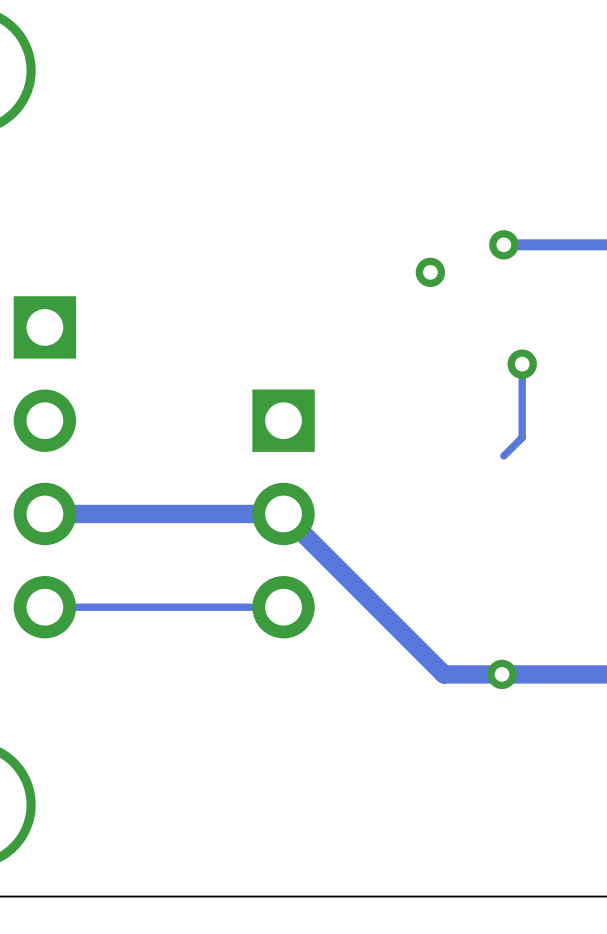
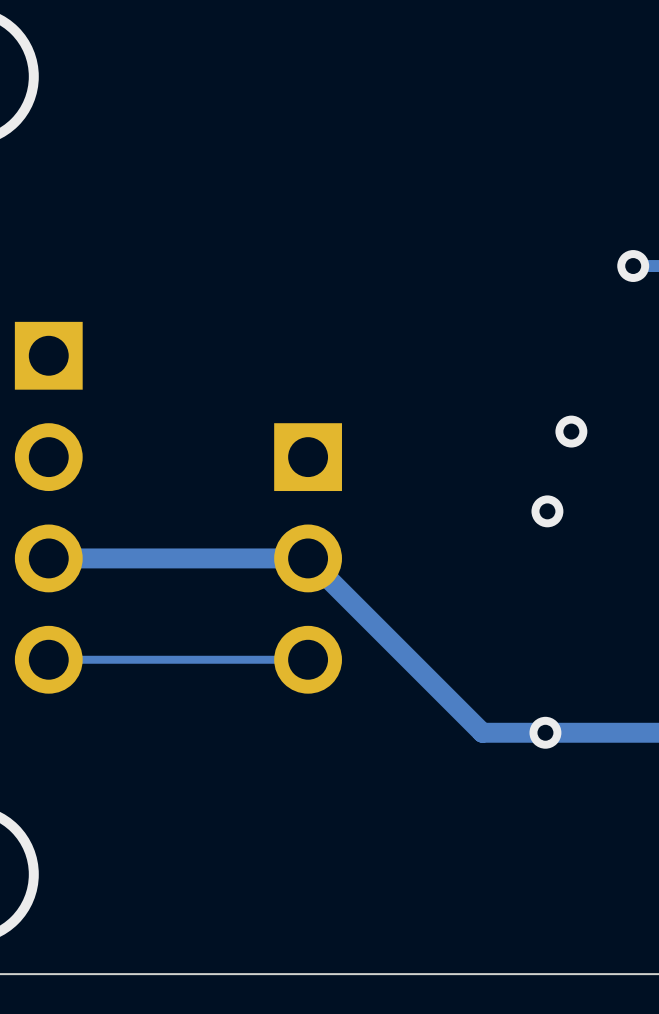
via: (503, 244) -> none
track: (582, 244) (503, 244) -> none
via: none -> (633, 266)
via: (430, 272) -> none
track: (522, 364) (522, 437) (503, 455) -> none
via position: (522, 364) -> (571, 431)
via: none -> (547, 511)

